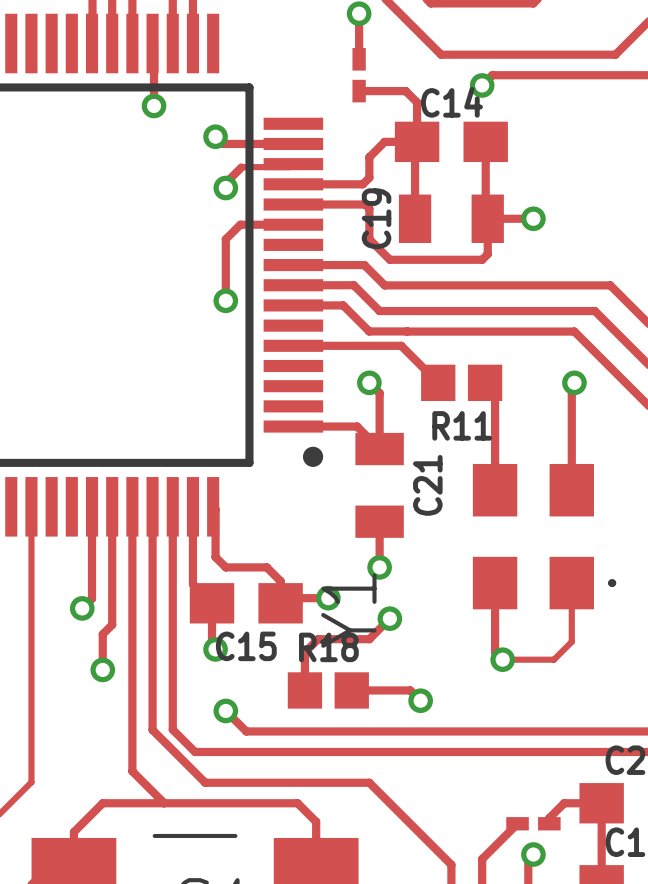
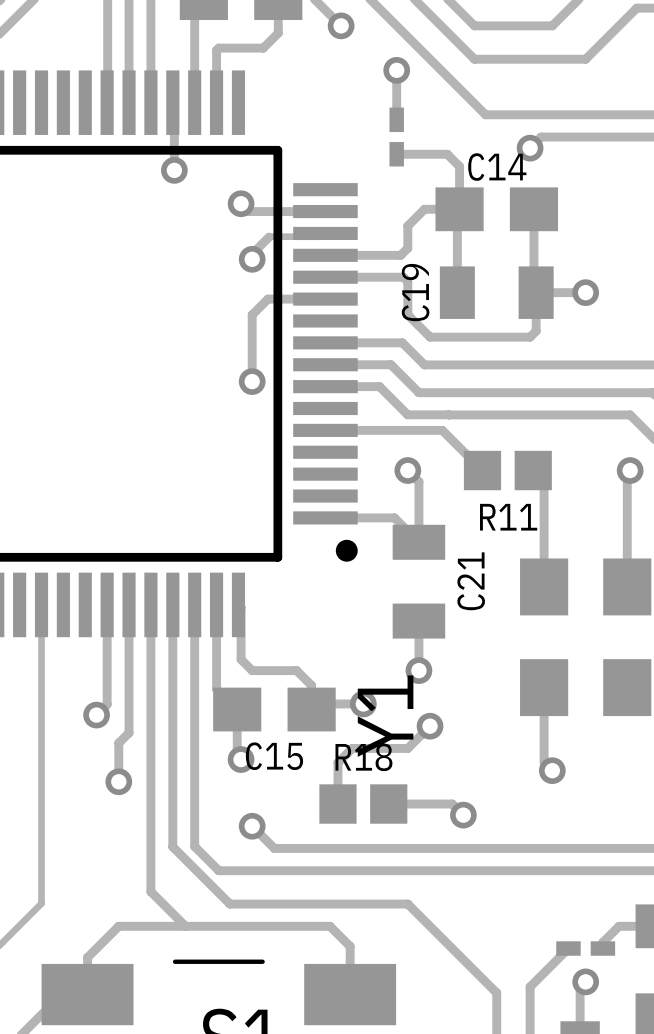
track: (571, 583) (571, 641) (553, 659) (502, 659) -> none

